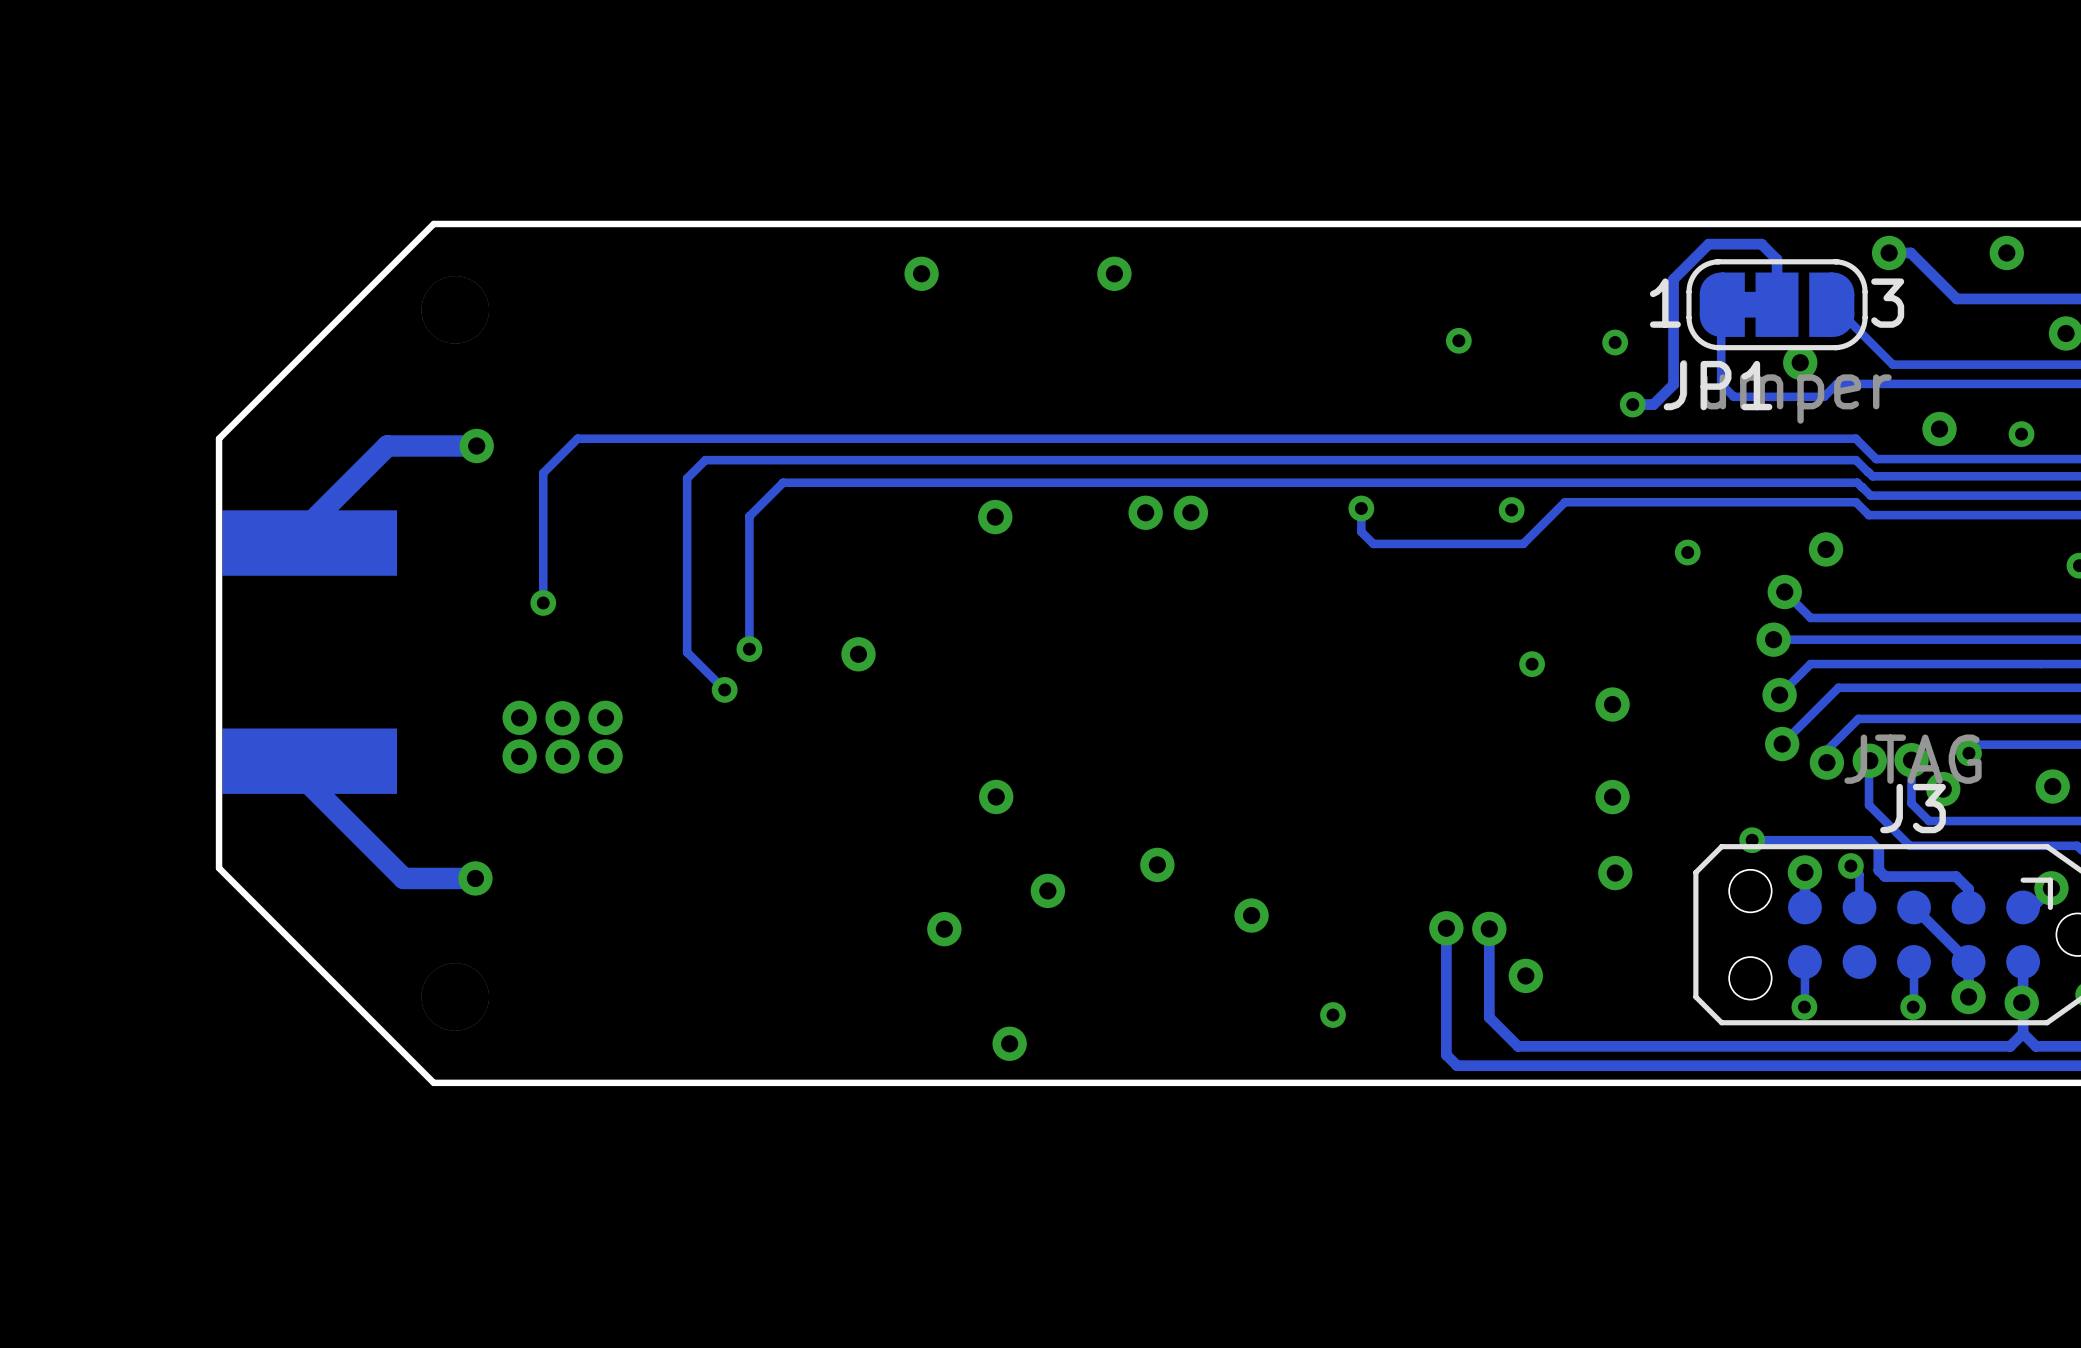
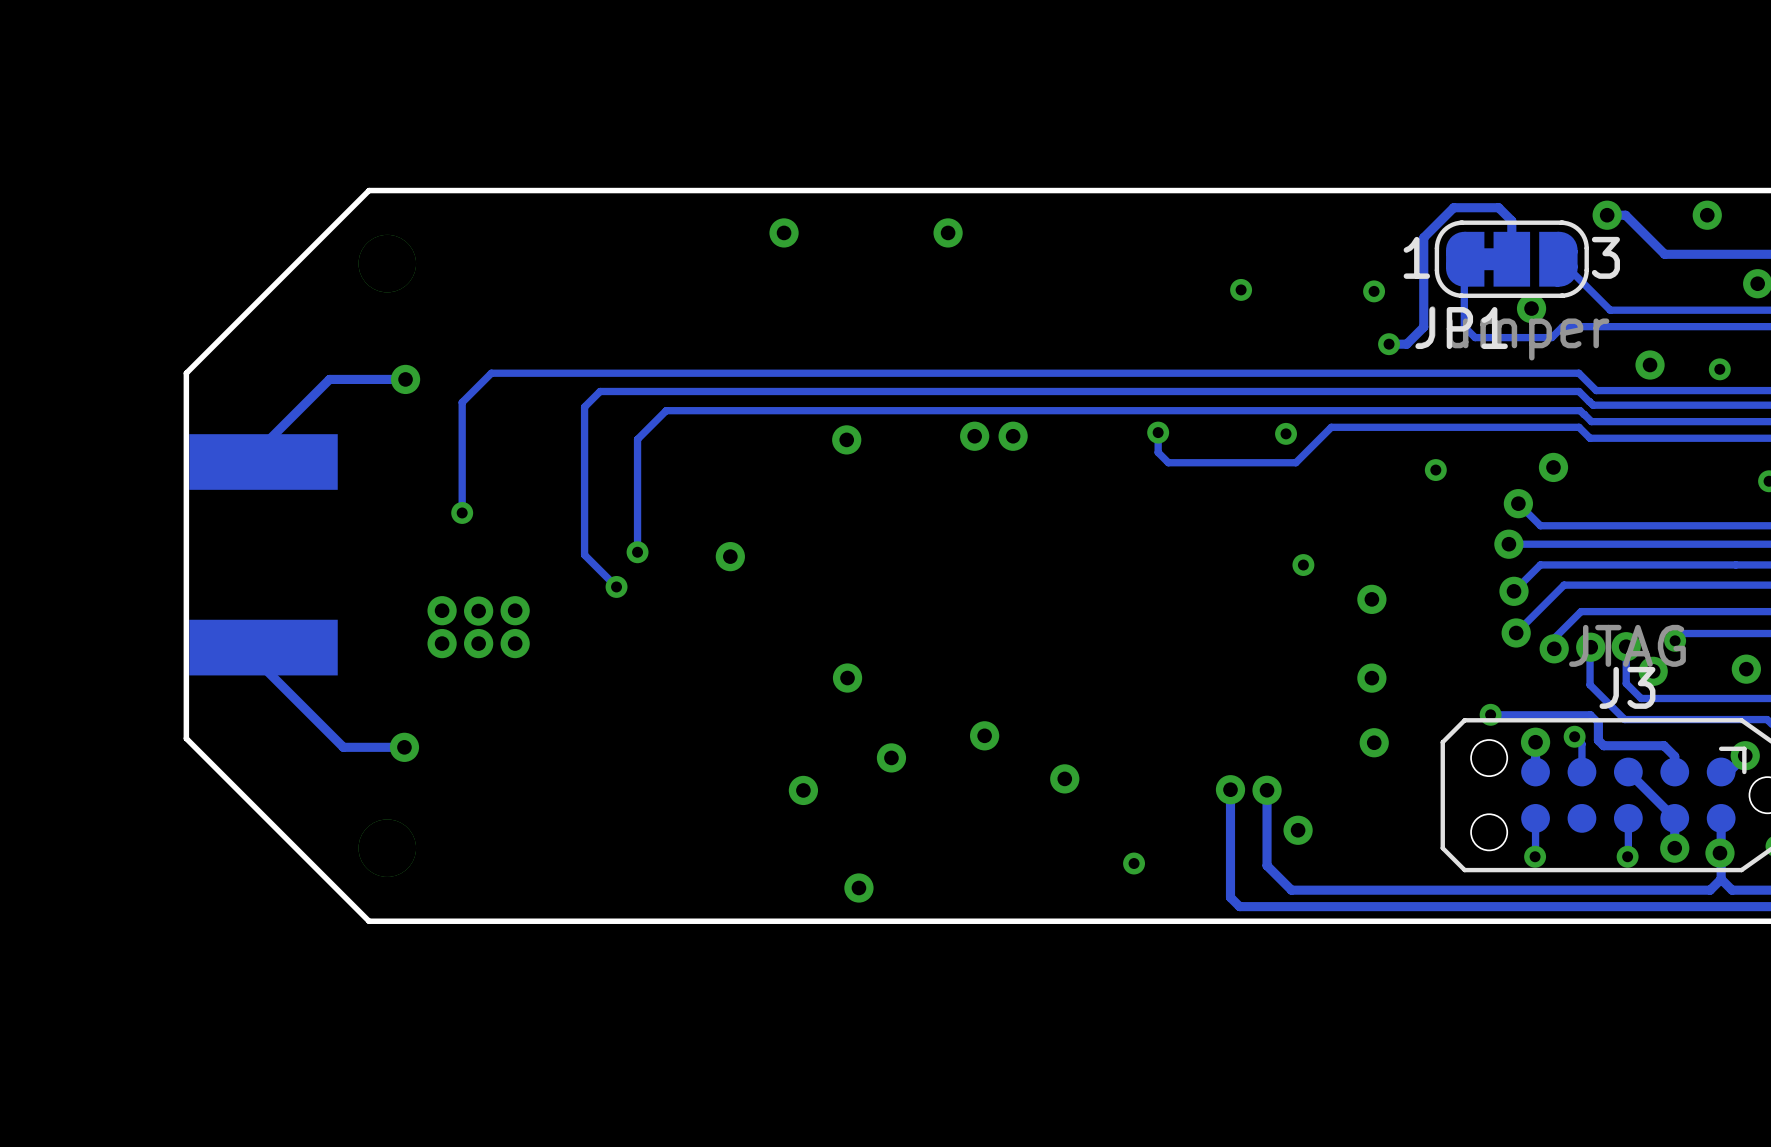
track width: thick (476, 446) (387, 446) (309, 523) (309, 543) -> thin (405, 379) (329, 379) (263, 445) (263, 462)
track width: thick (309, 761) (309, 784) (403, 878) (475, 878) -> thin (263, 647) (263, 667) (343, 747) (404, 747)

